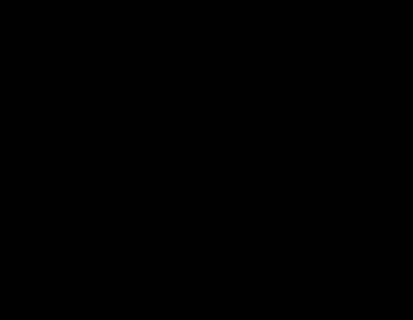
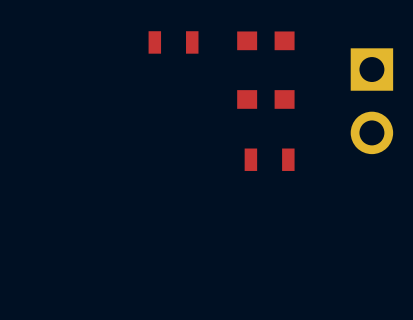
part: none -> (265, 40)
part: none -> (173, 42)
part: none -> (265, 99)
part: none -> (371, 101)
part: none -> (269, 159)

